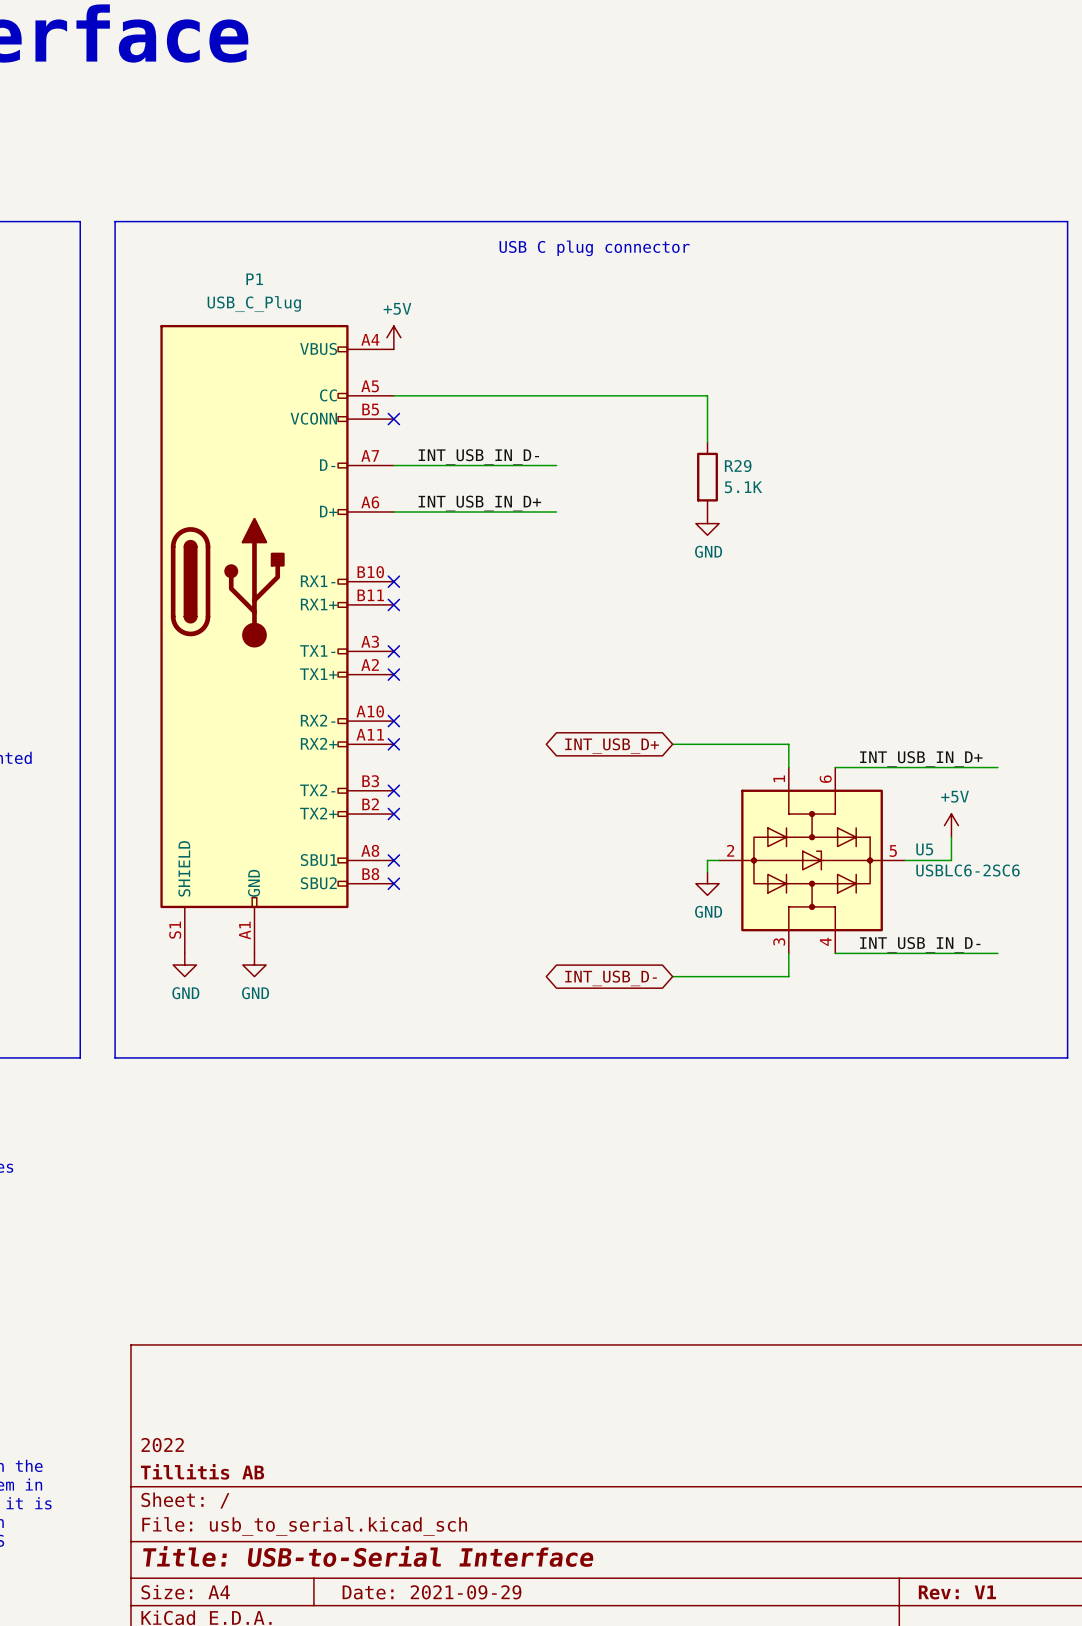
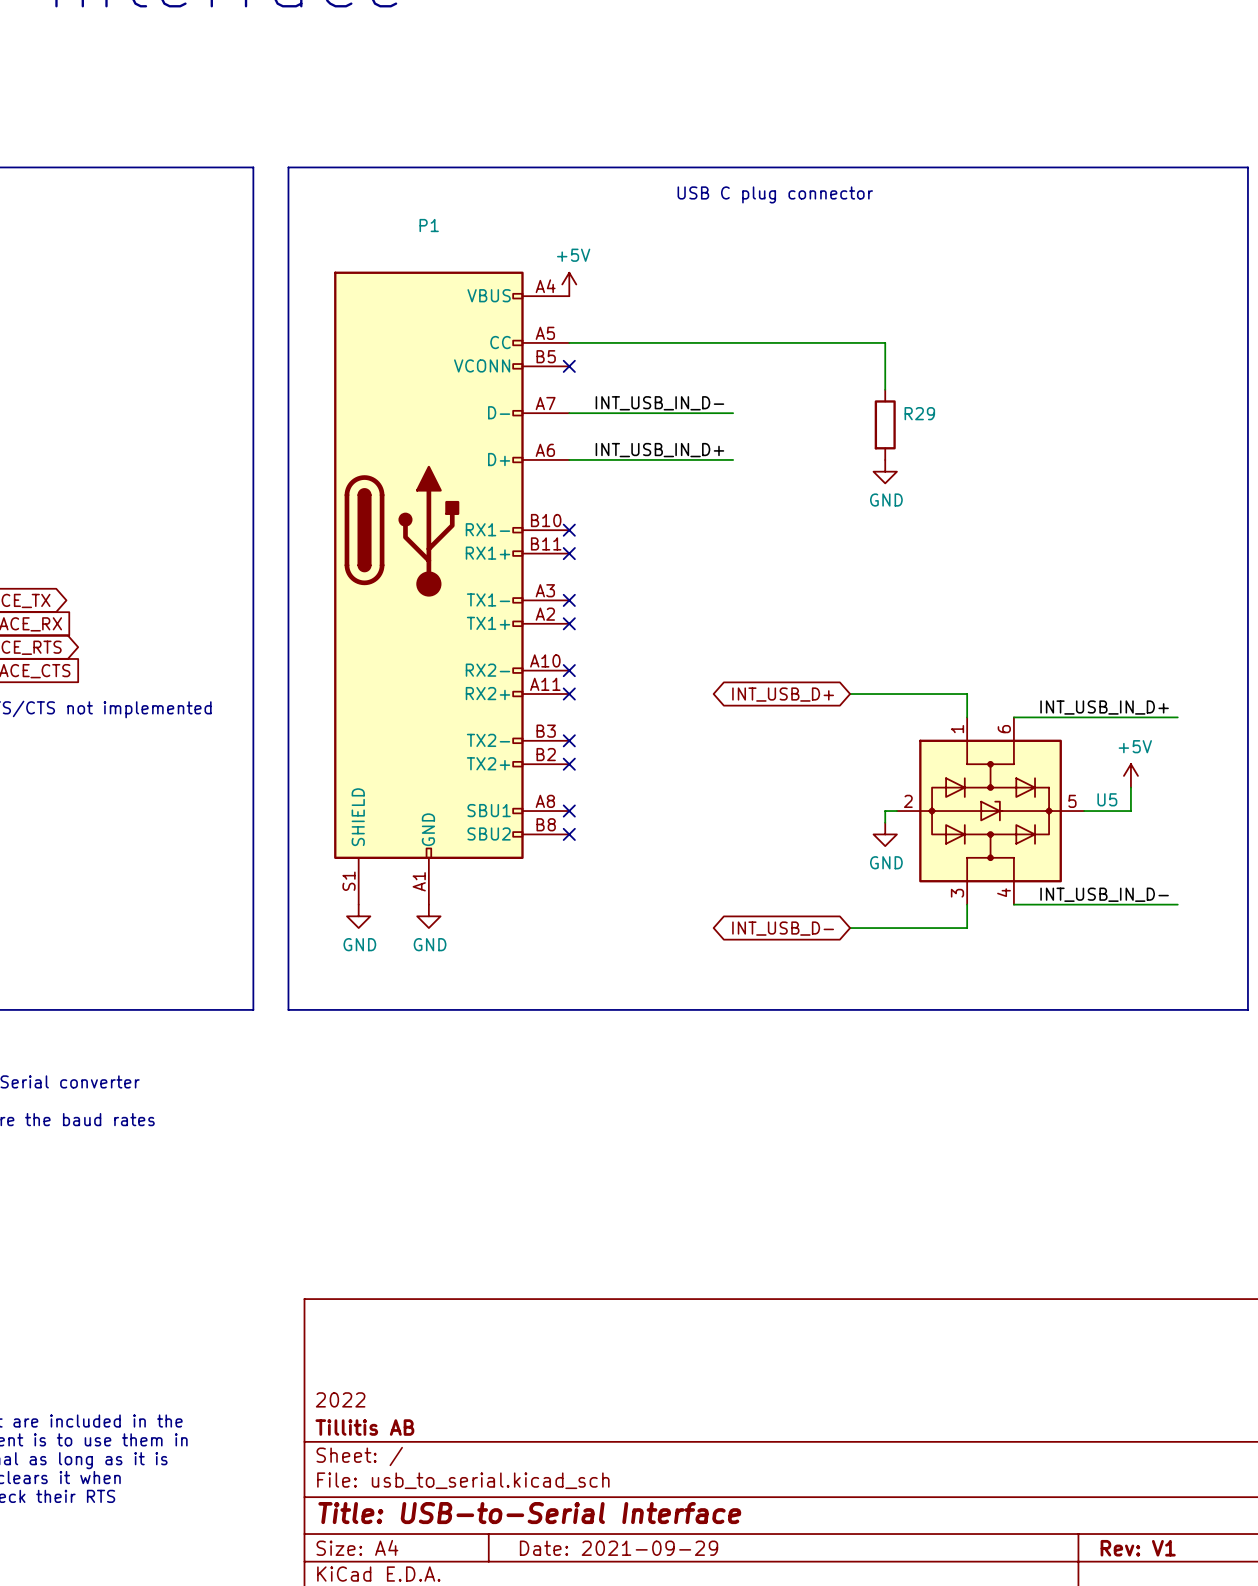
P1 value: USB_C_Plug (254, 304) -> none
R29 value: 5.1K (743, 487) -> none
U5 value: USBLC6-2SC6 (968, 870) -> none

